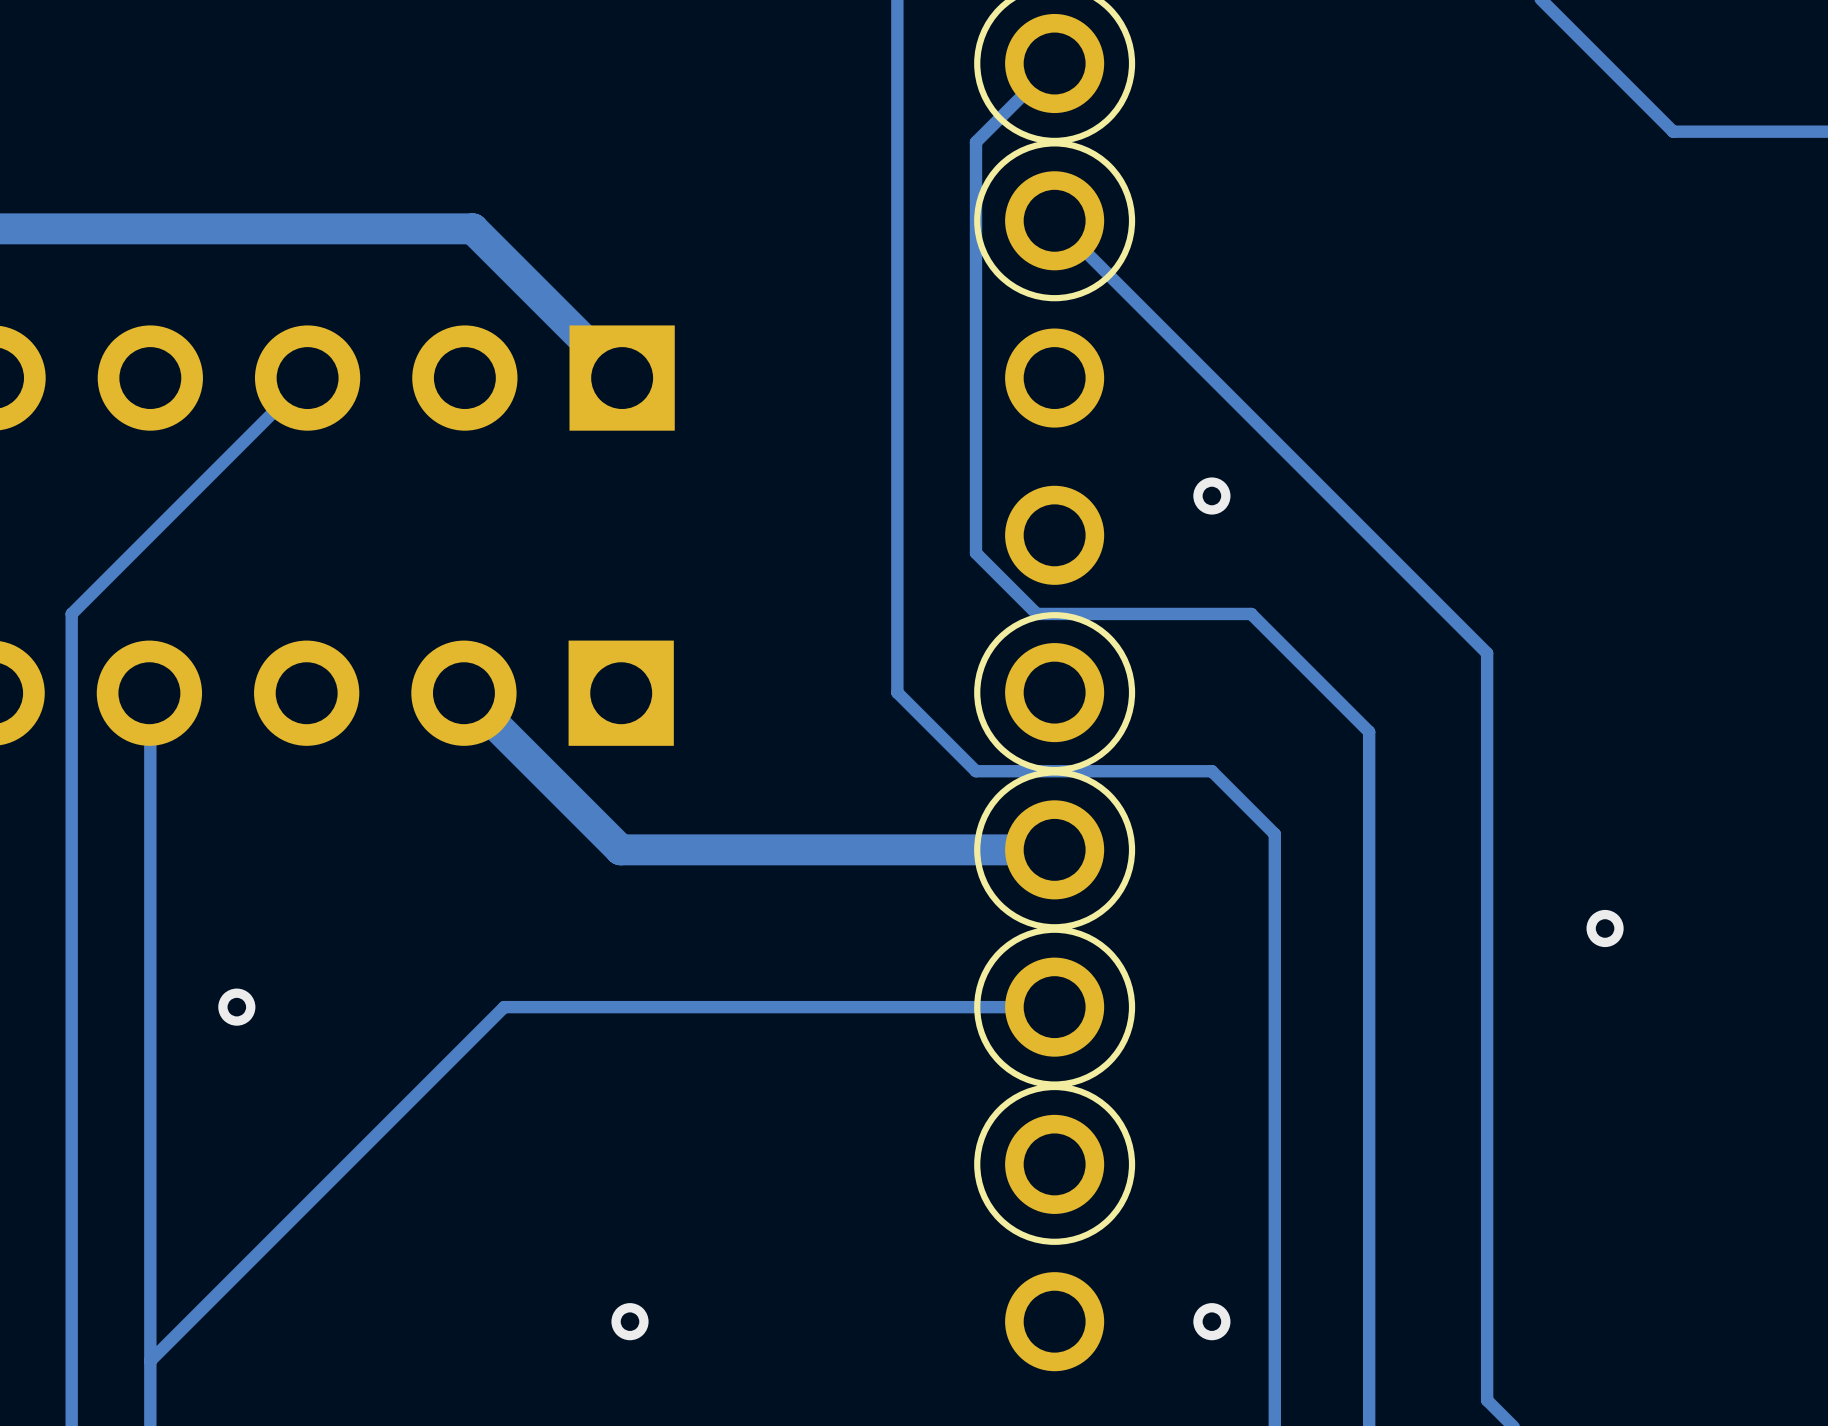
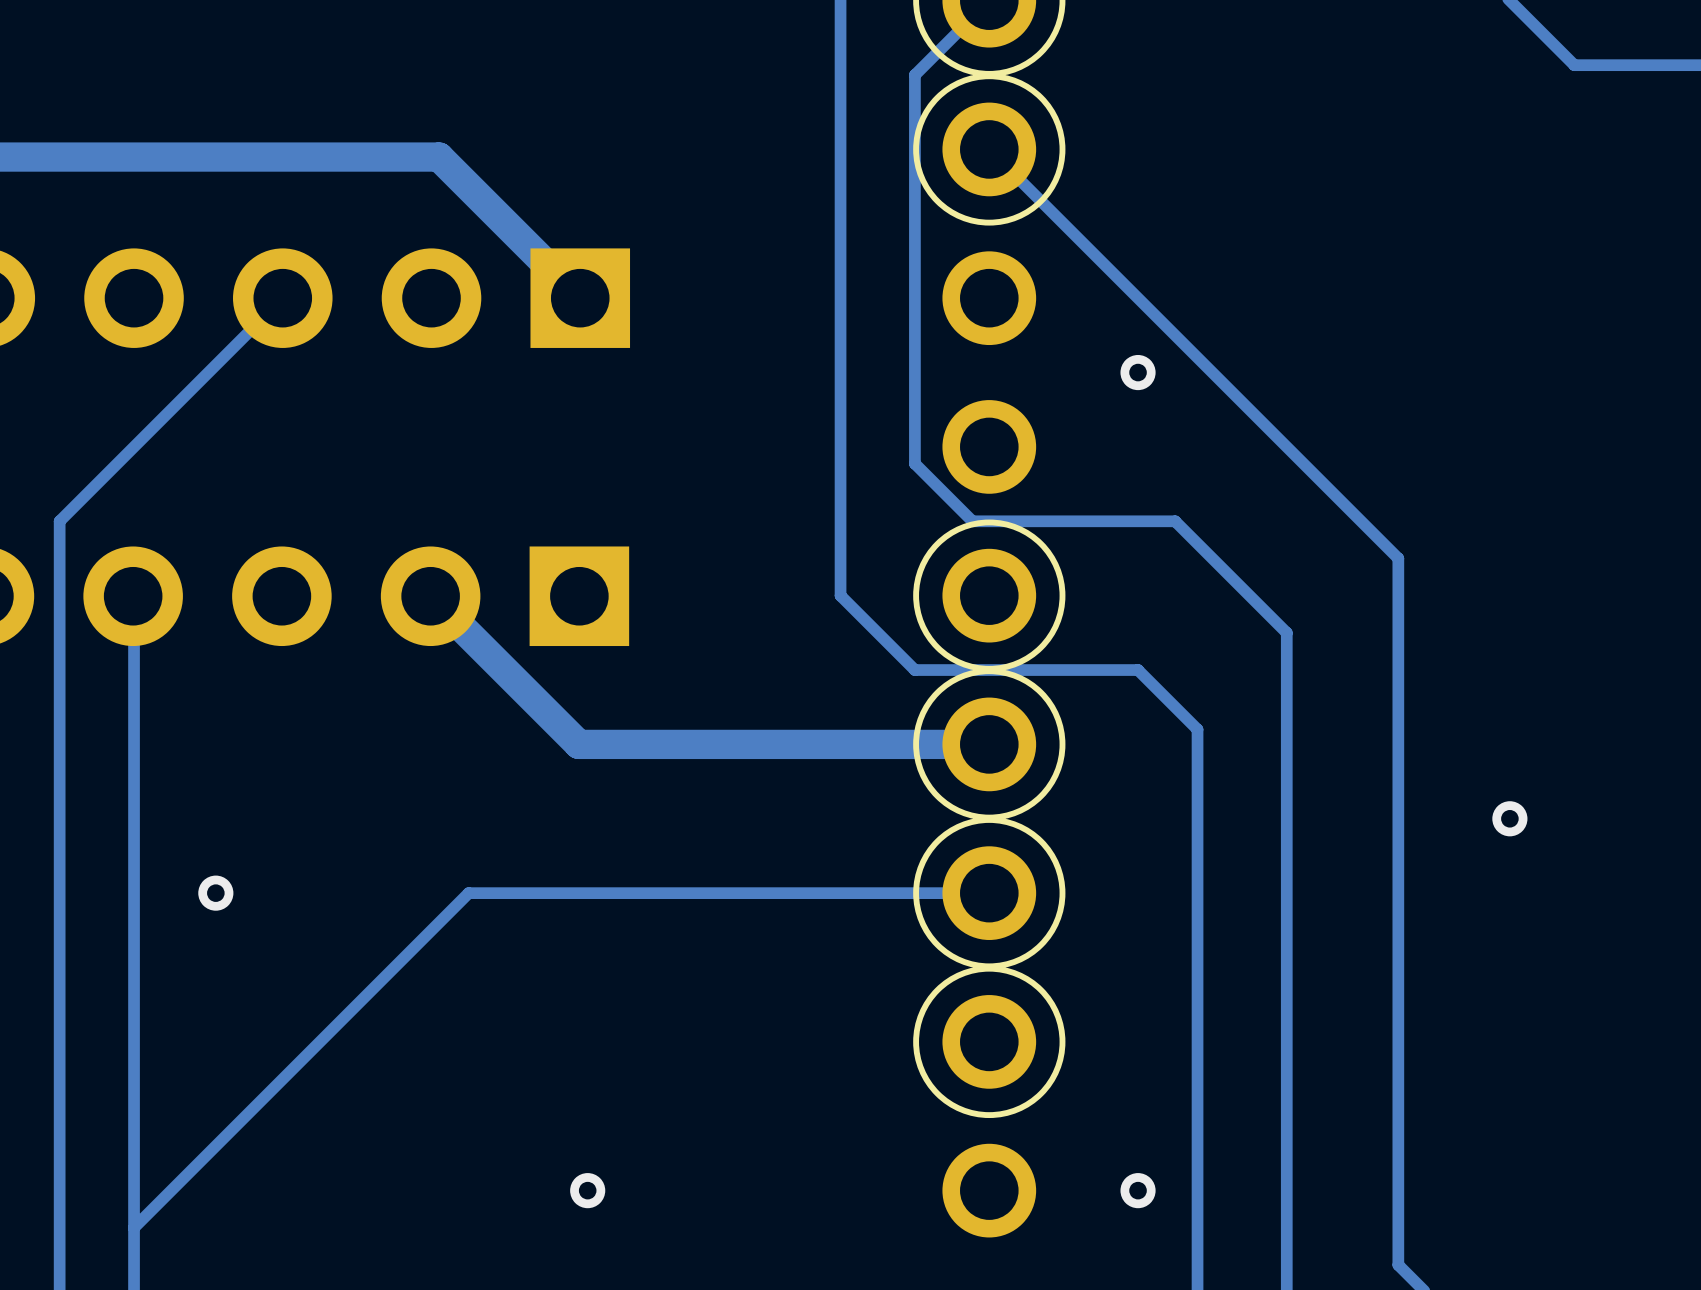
via position: (1211, 496) -> (1138, 372)

